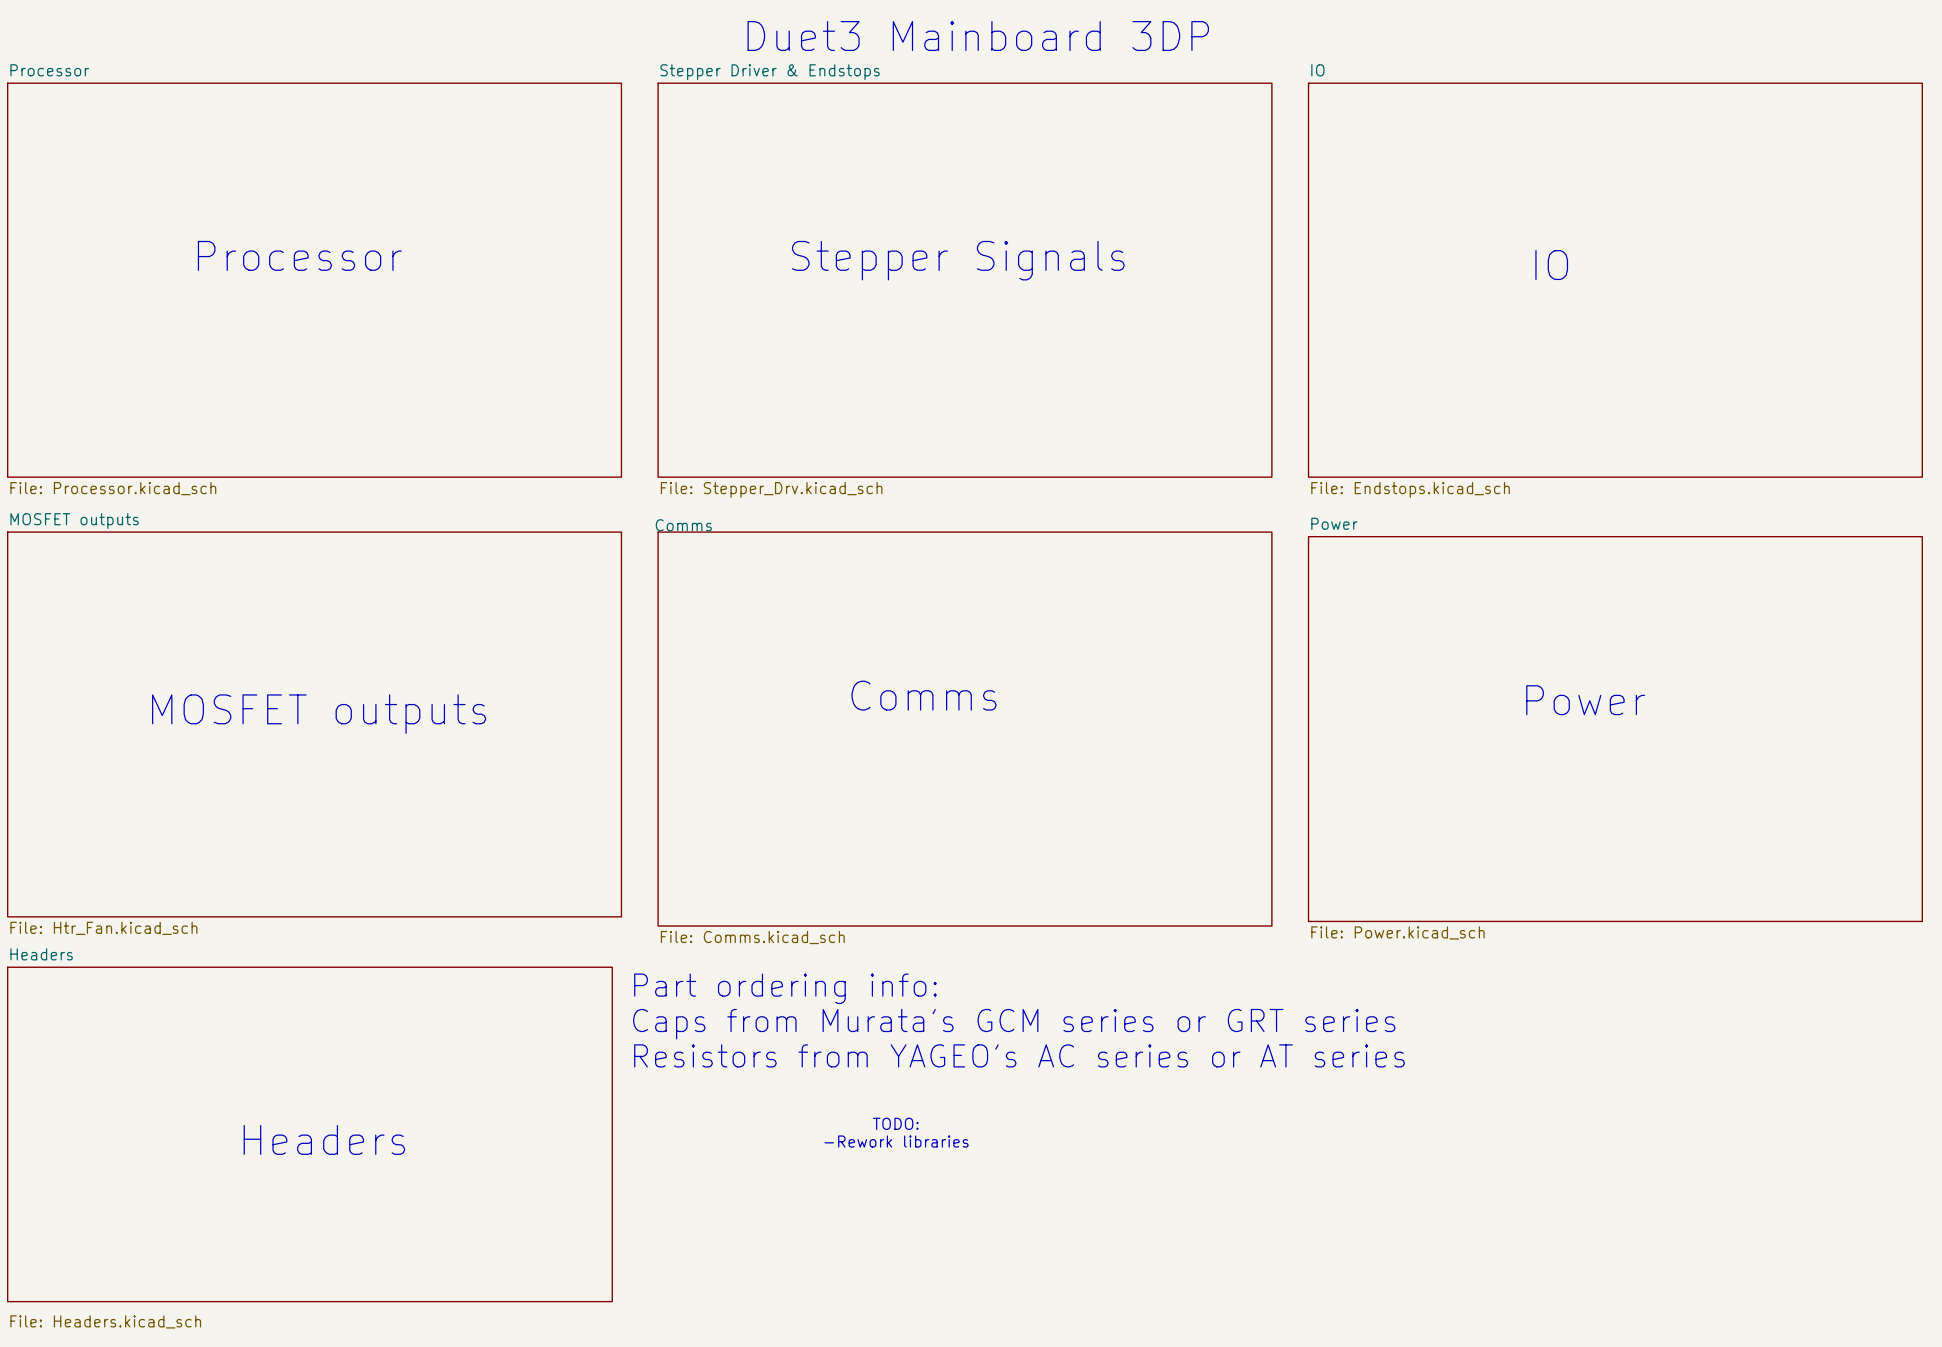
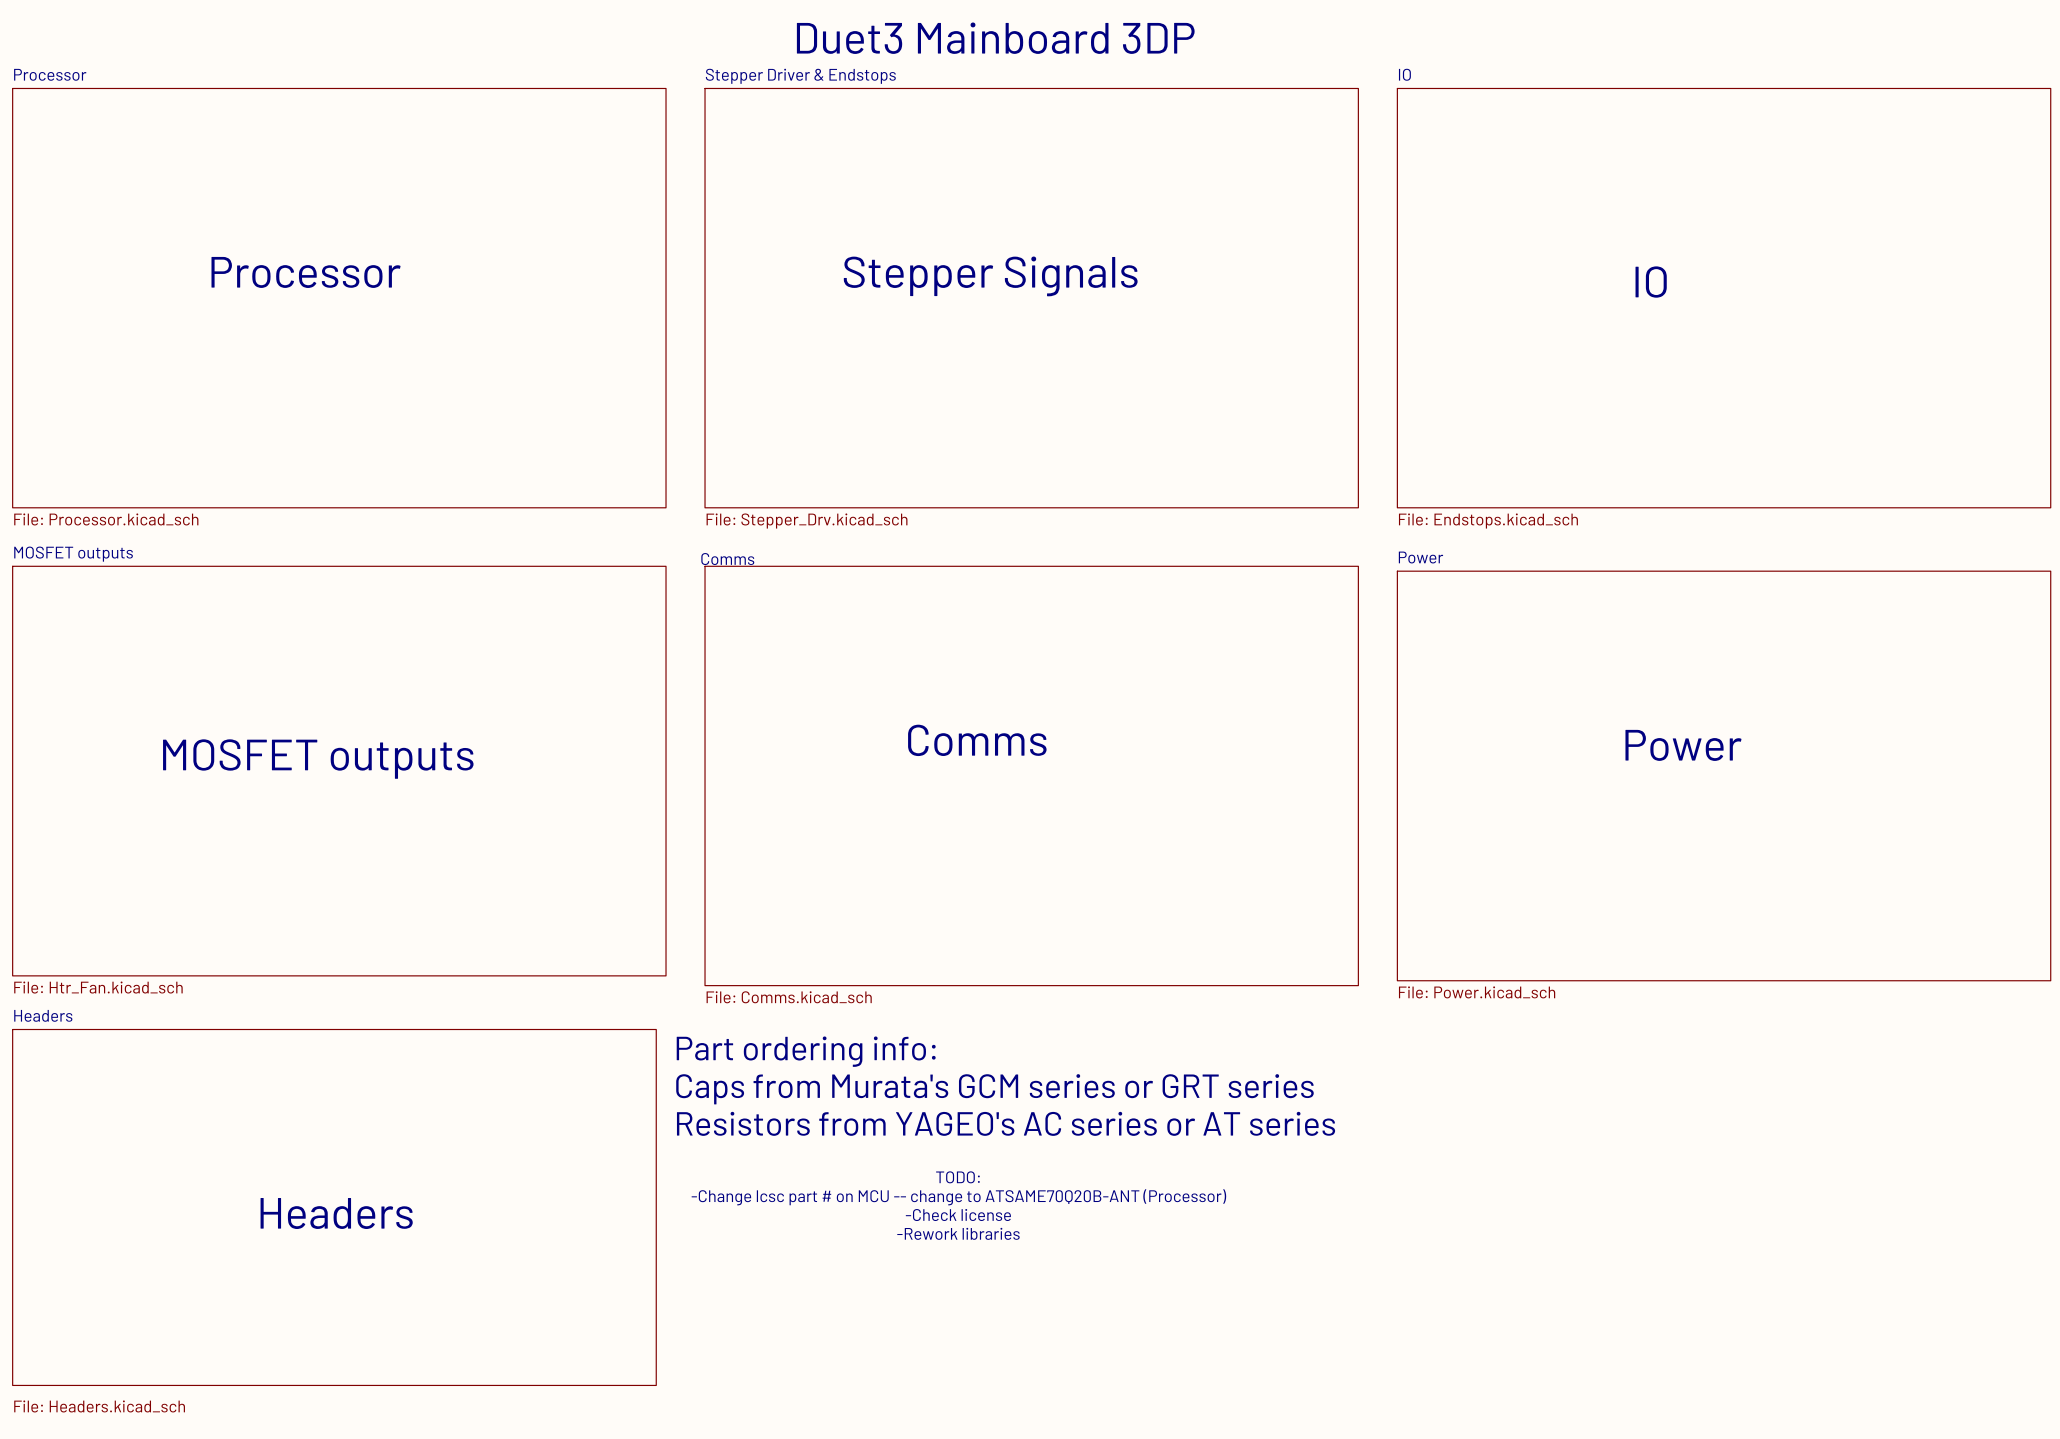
text: none -> TODO: (957, 1177)
text: TODO: (895, 1123) -> -Change lcsc part # on MCU -- change to ATSAME70Q20B-ANT (Processor) (958, 1197)
text: -Rework libraries (896, 1141) -> -Check license (958, 1215)
text: none -> -Rework libraries (958, 1233)

